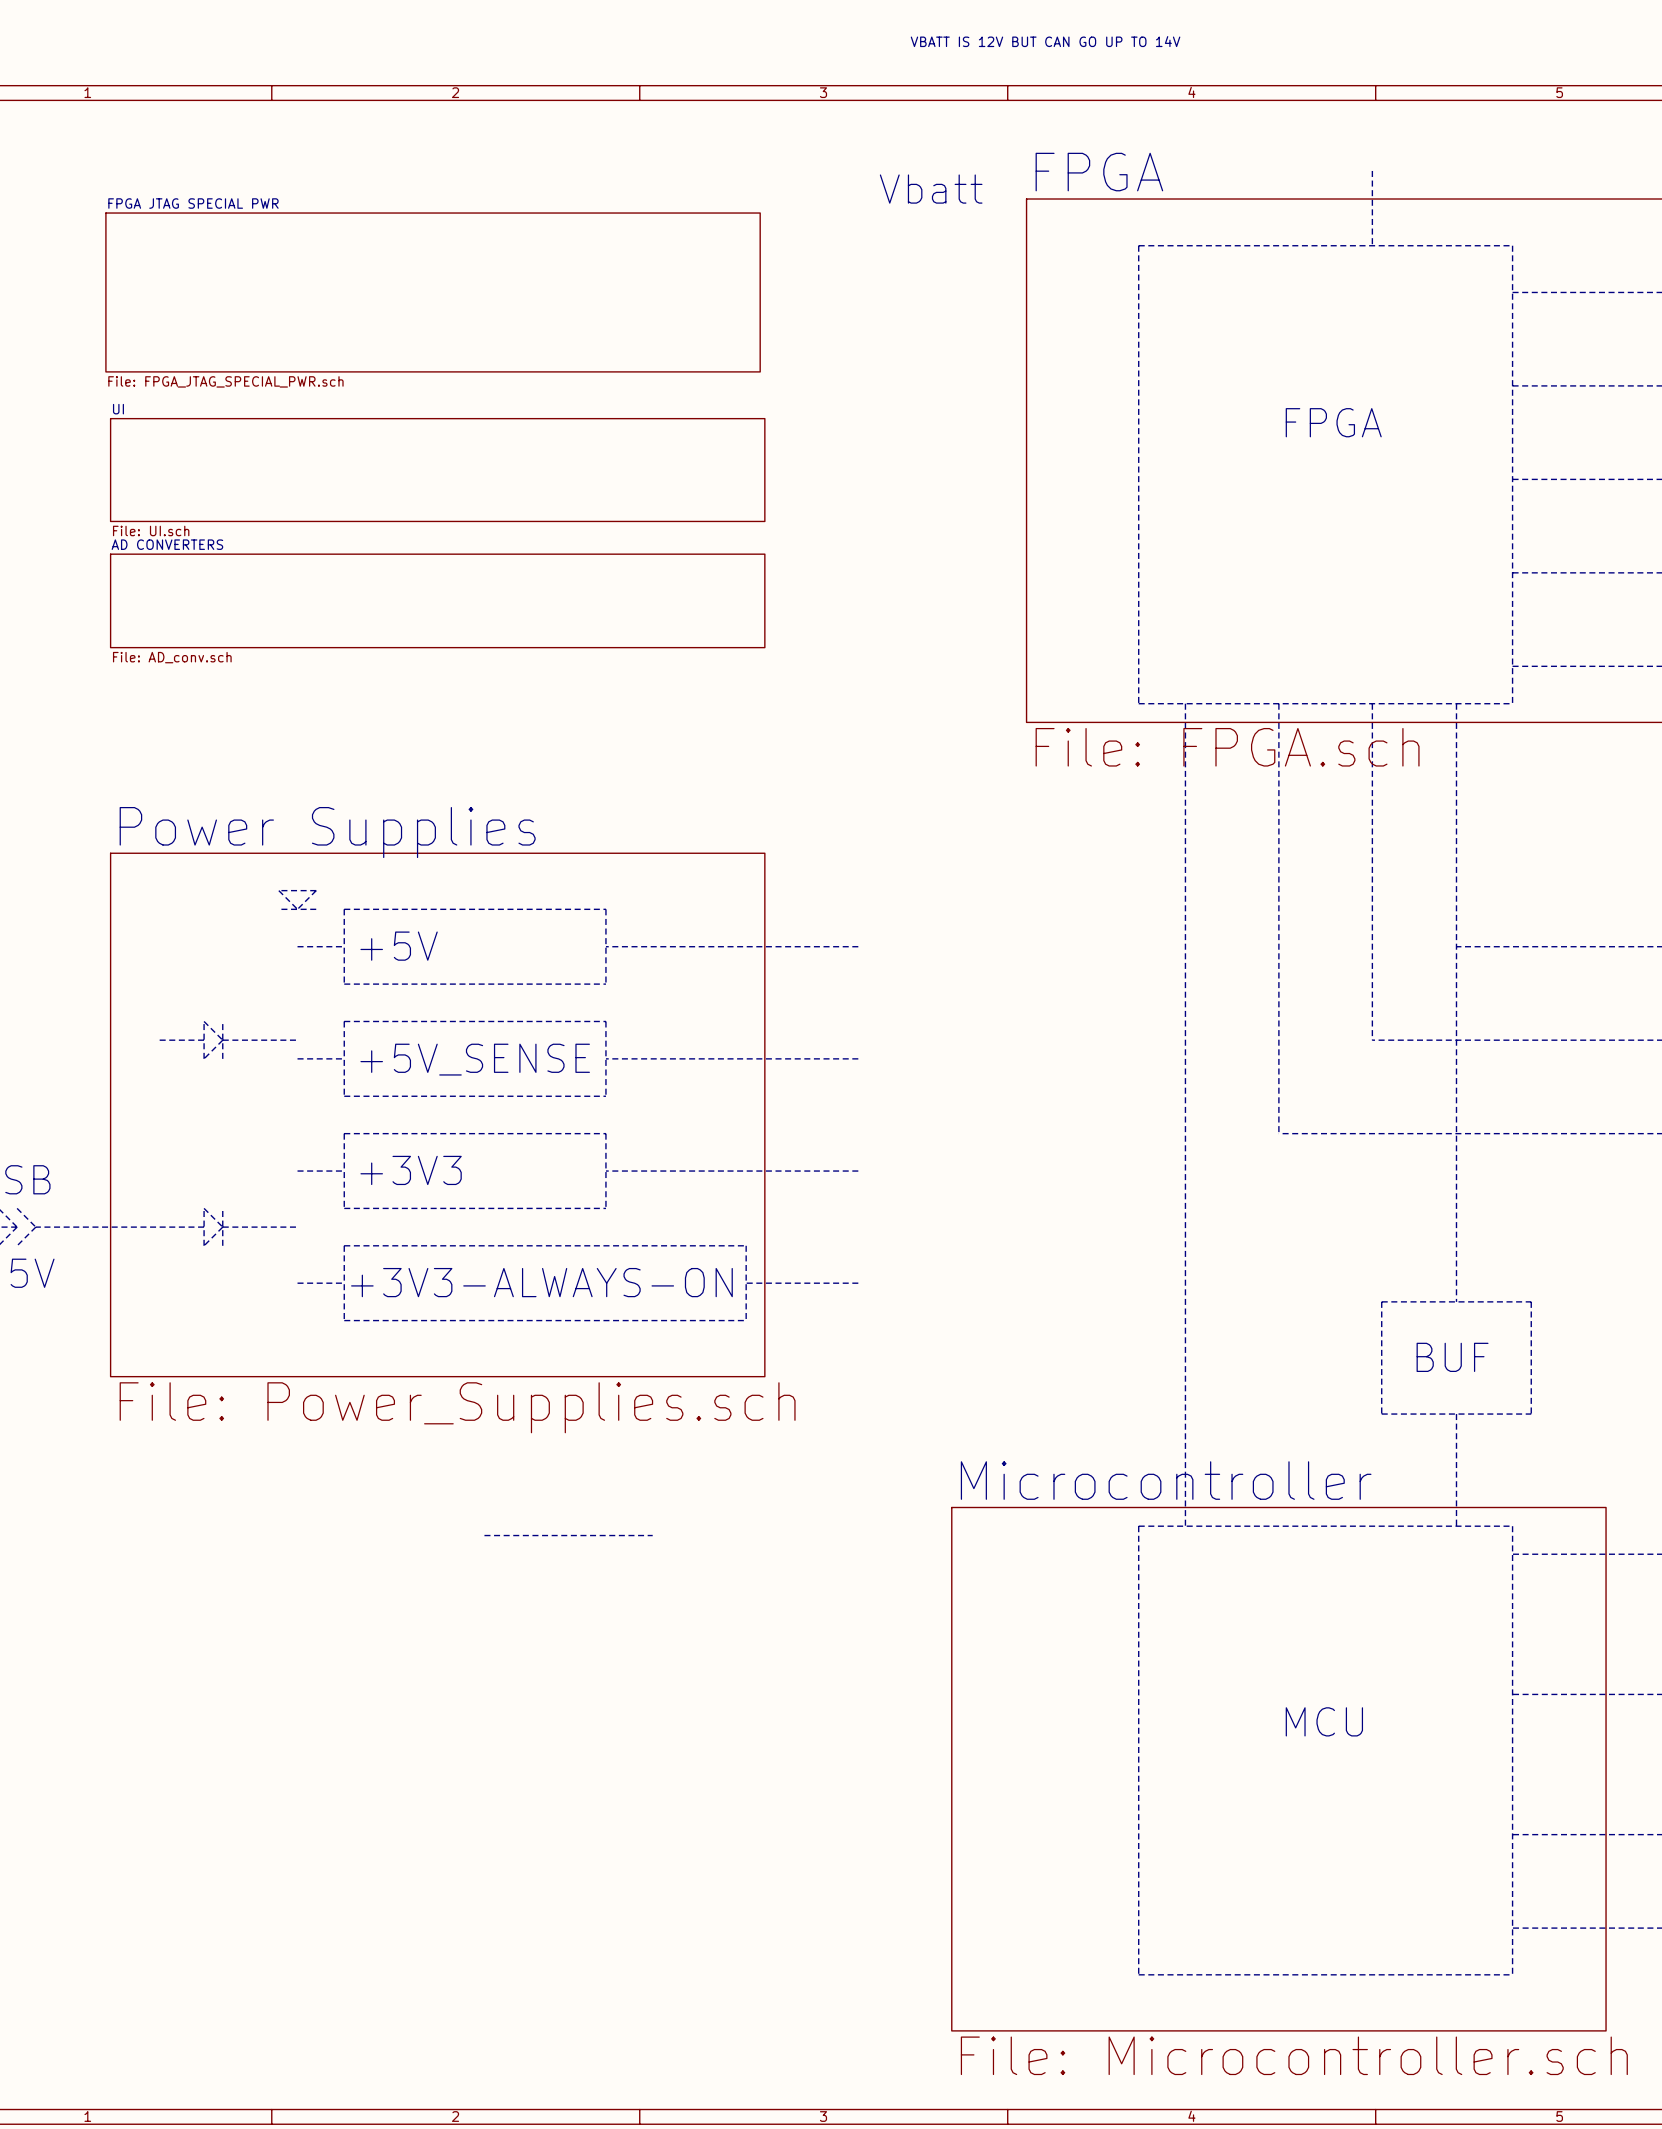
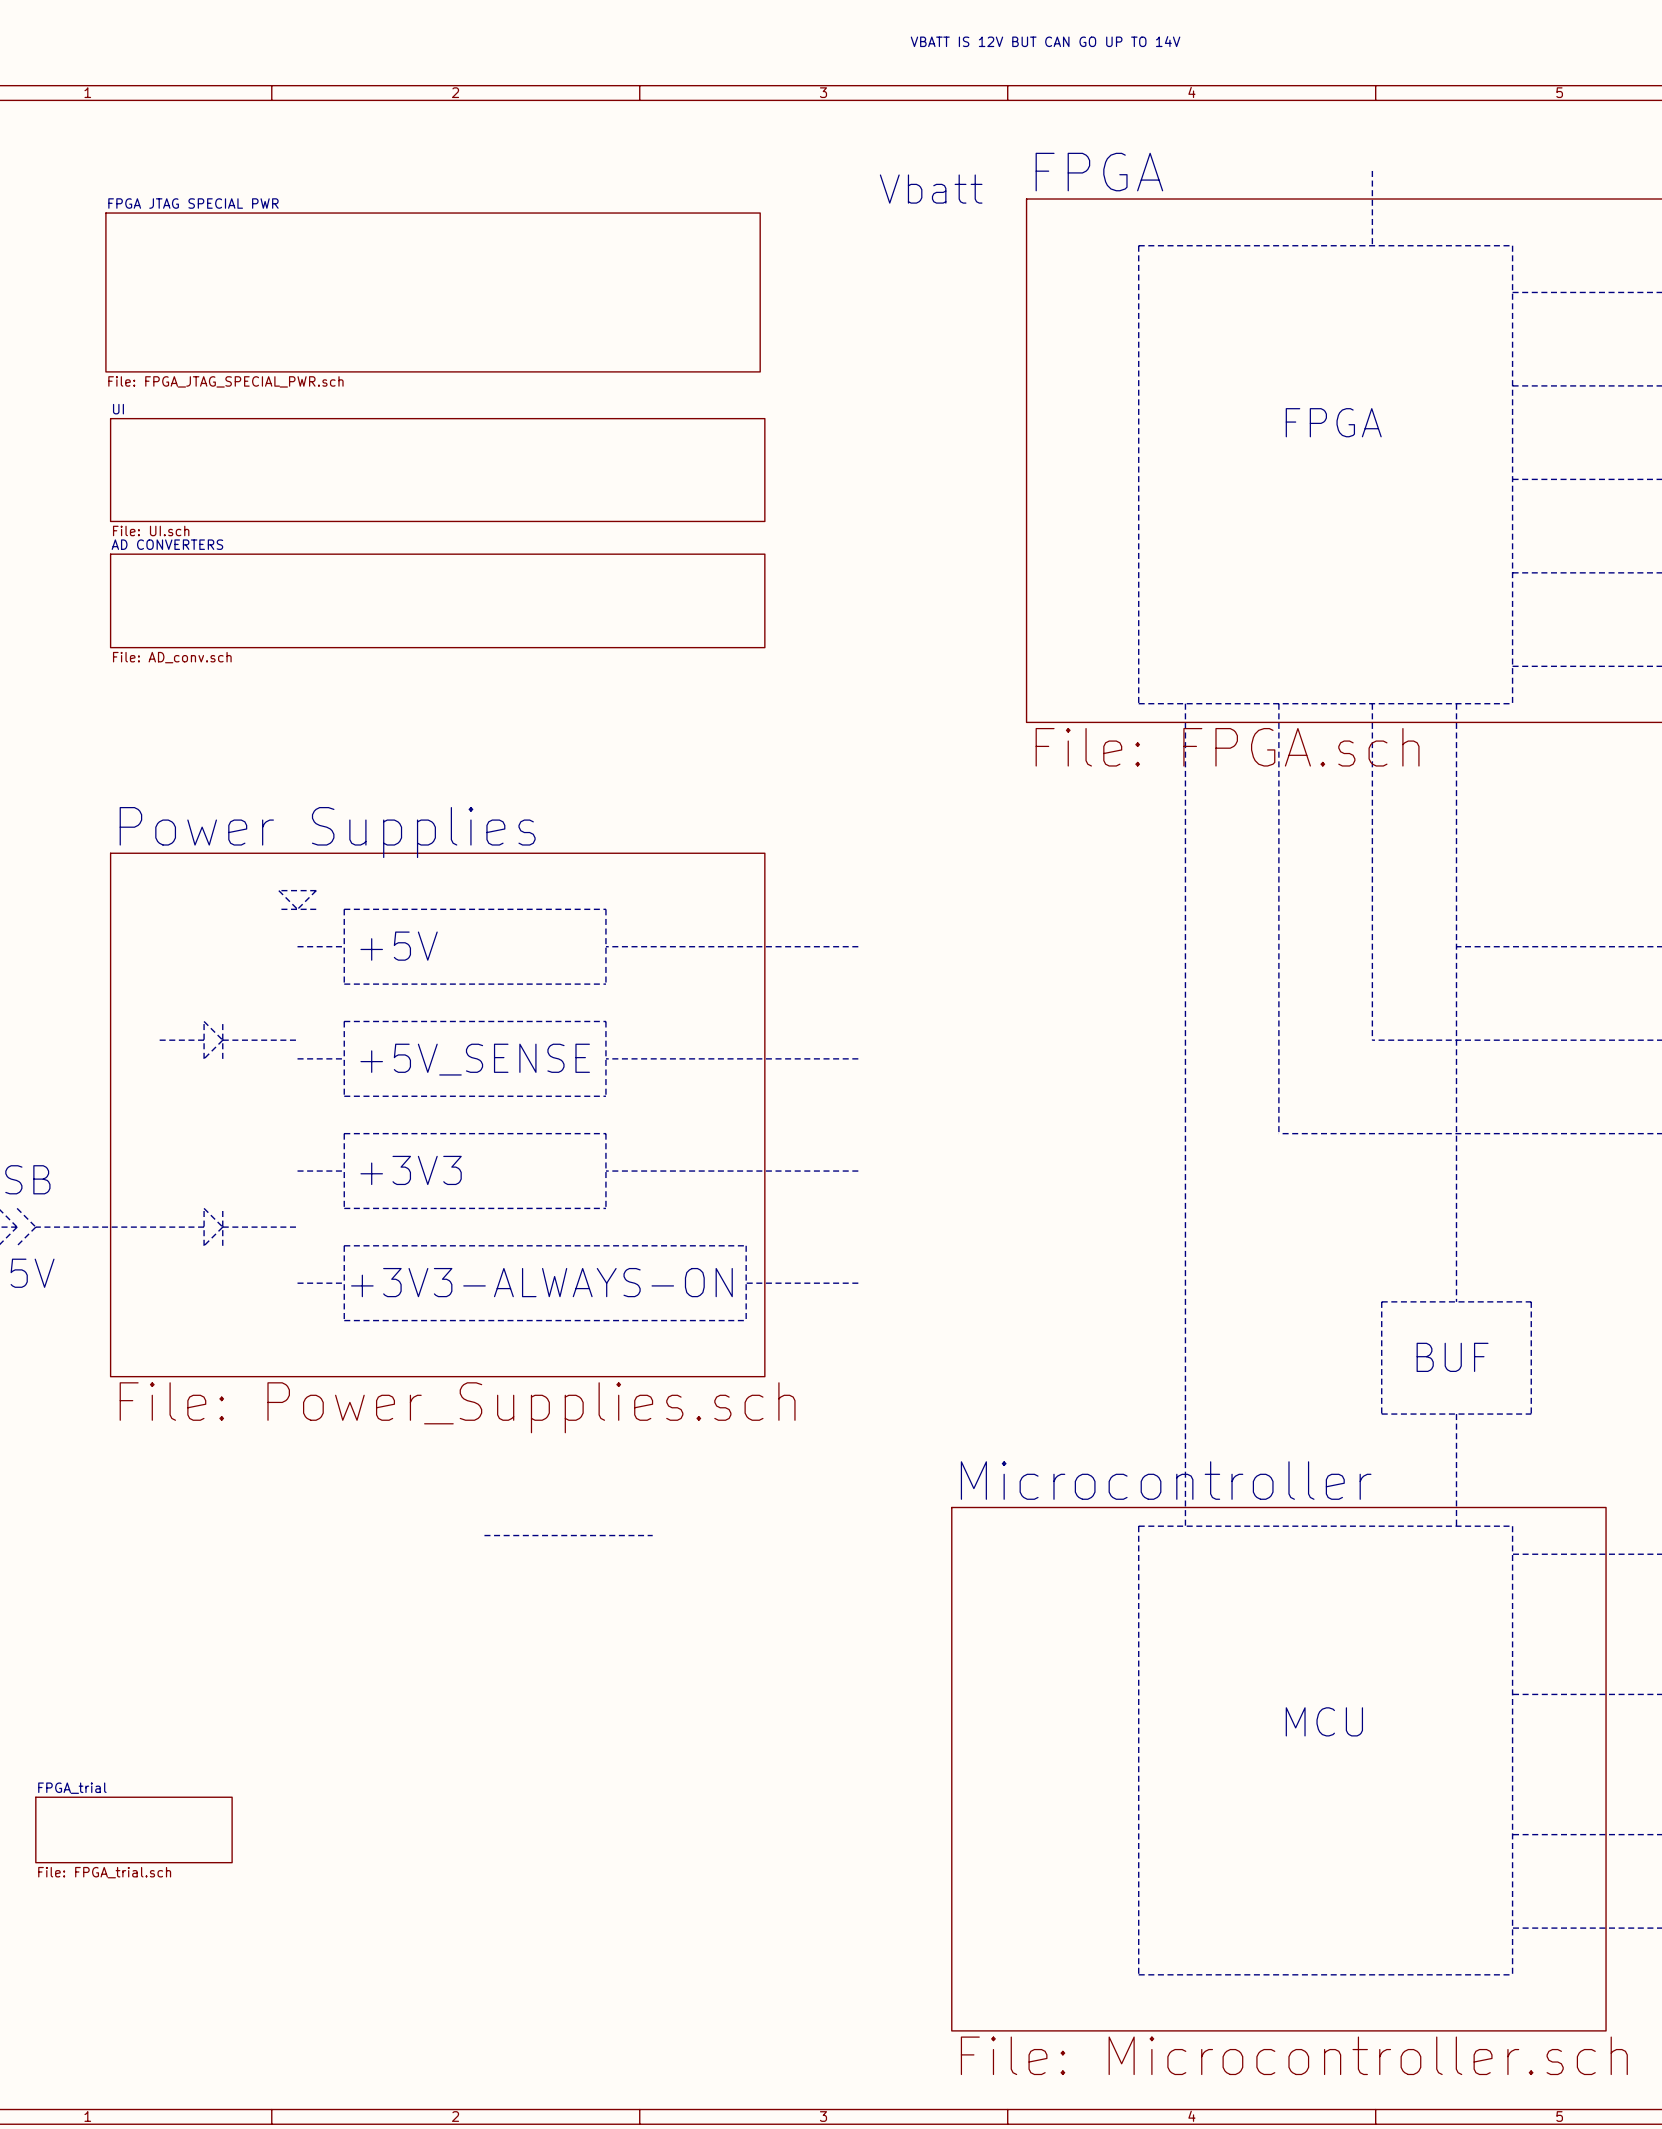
sheet FPGA_trial: none -> File: FPGA_trial.sch (133, 1829)

